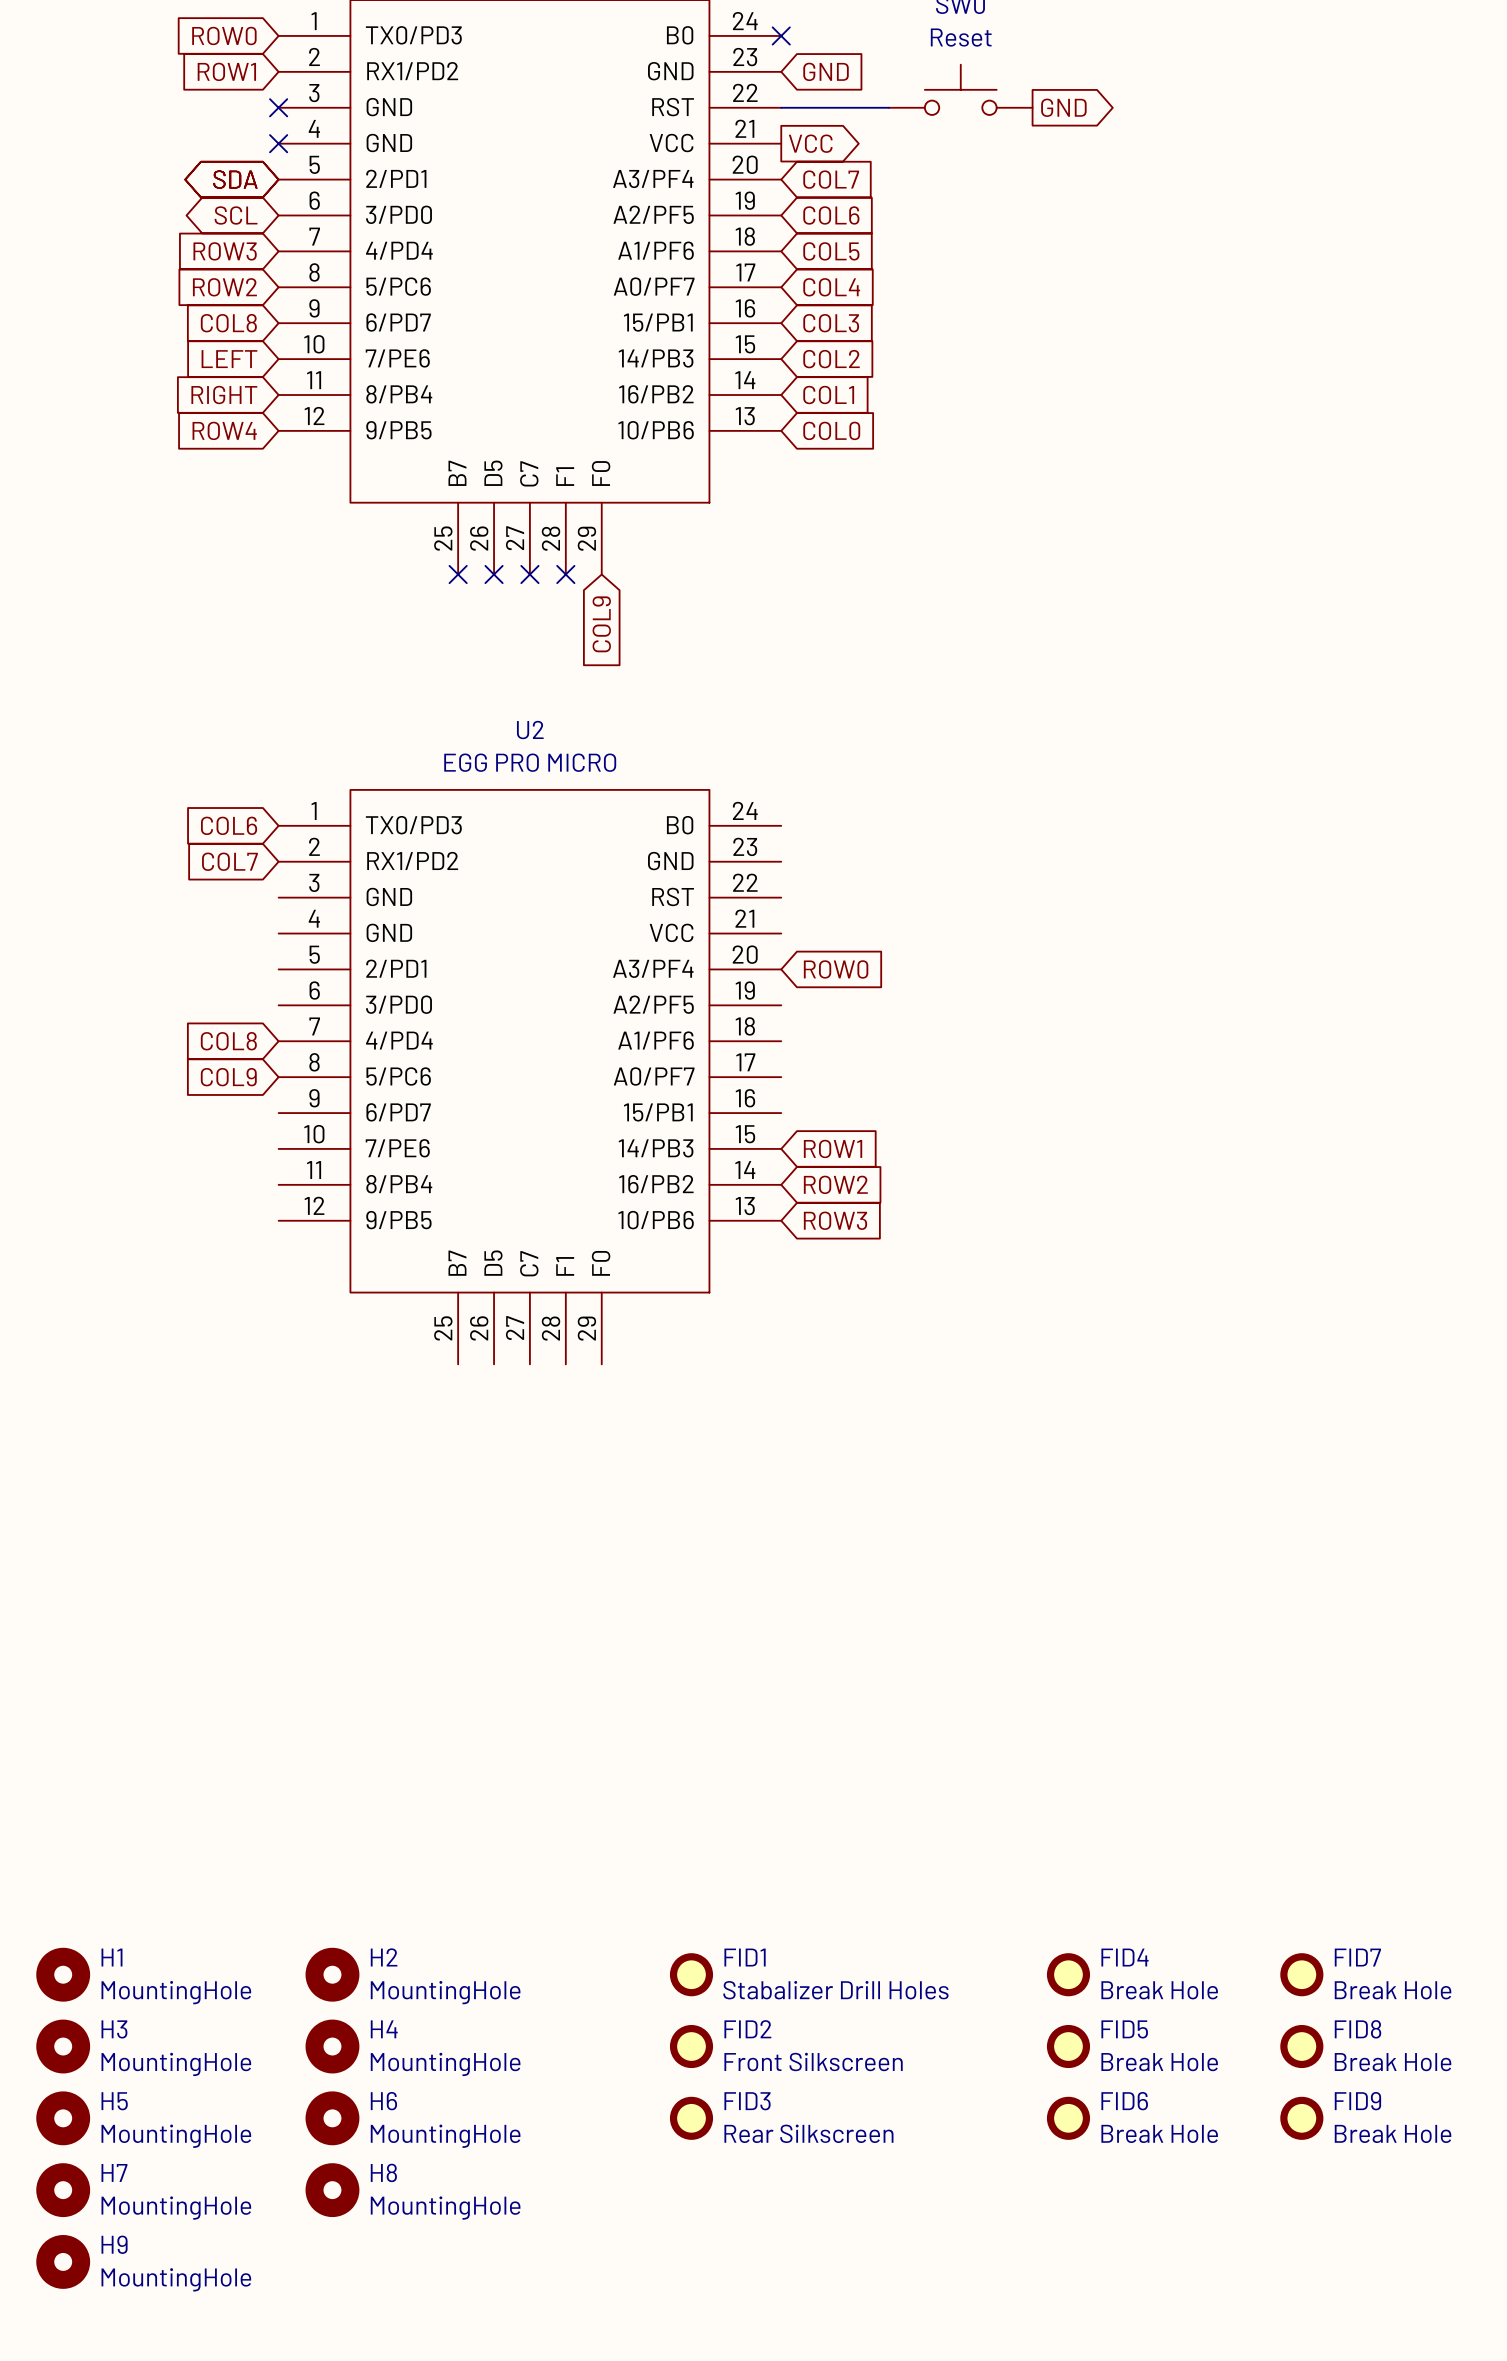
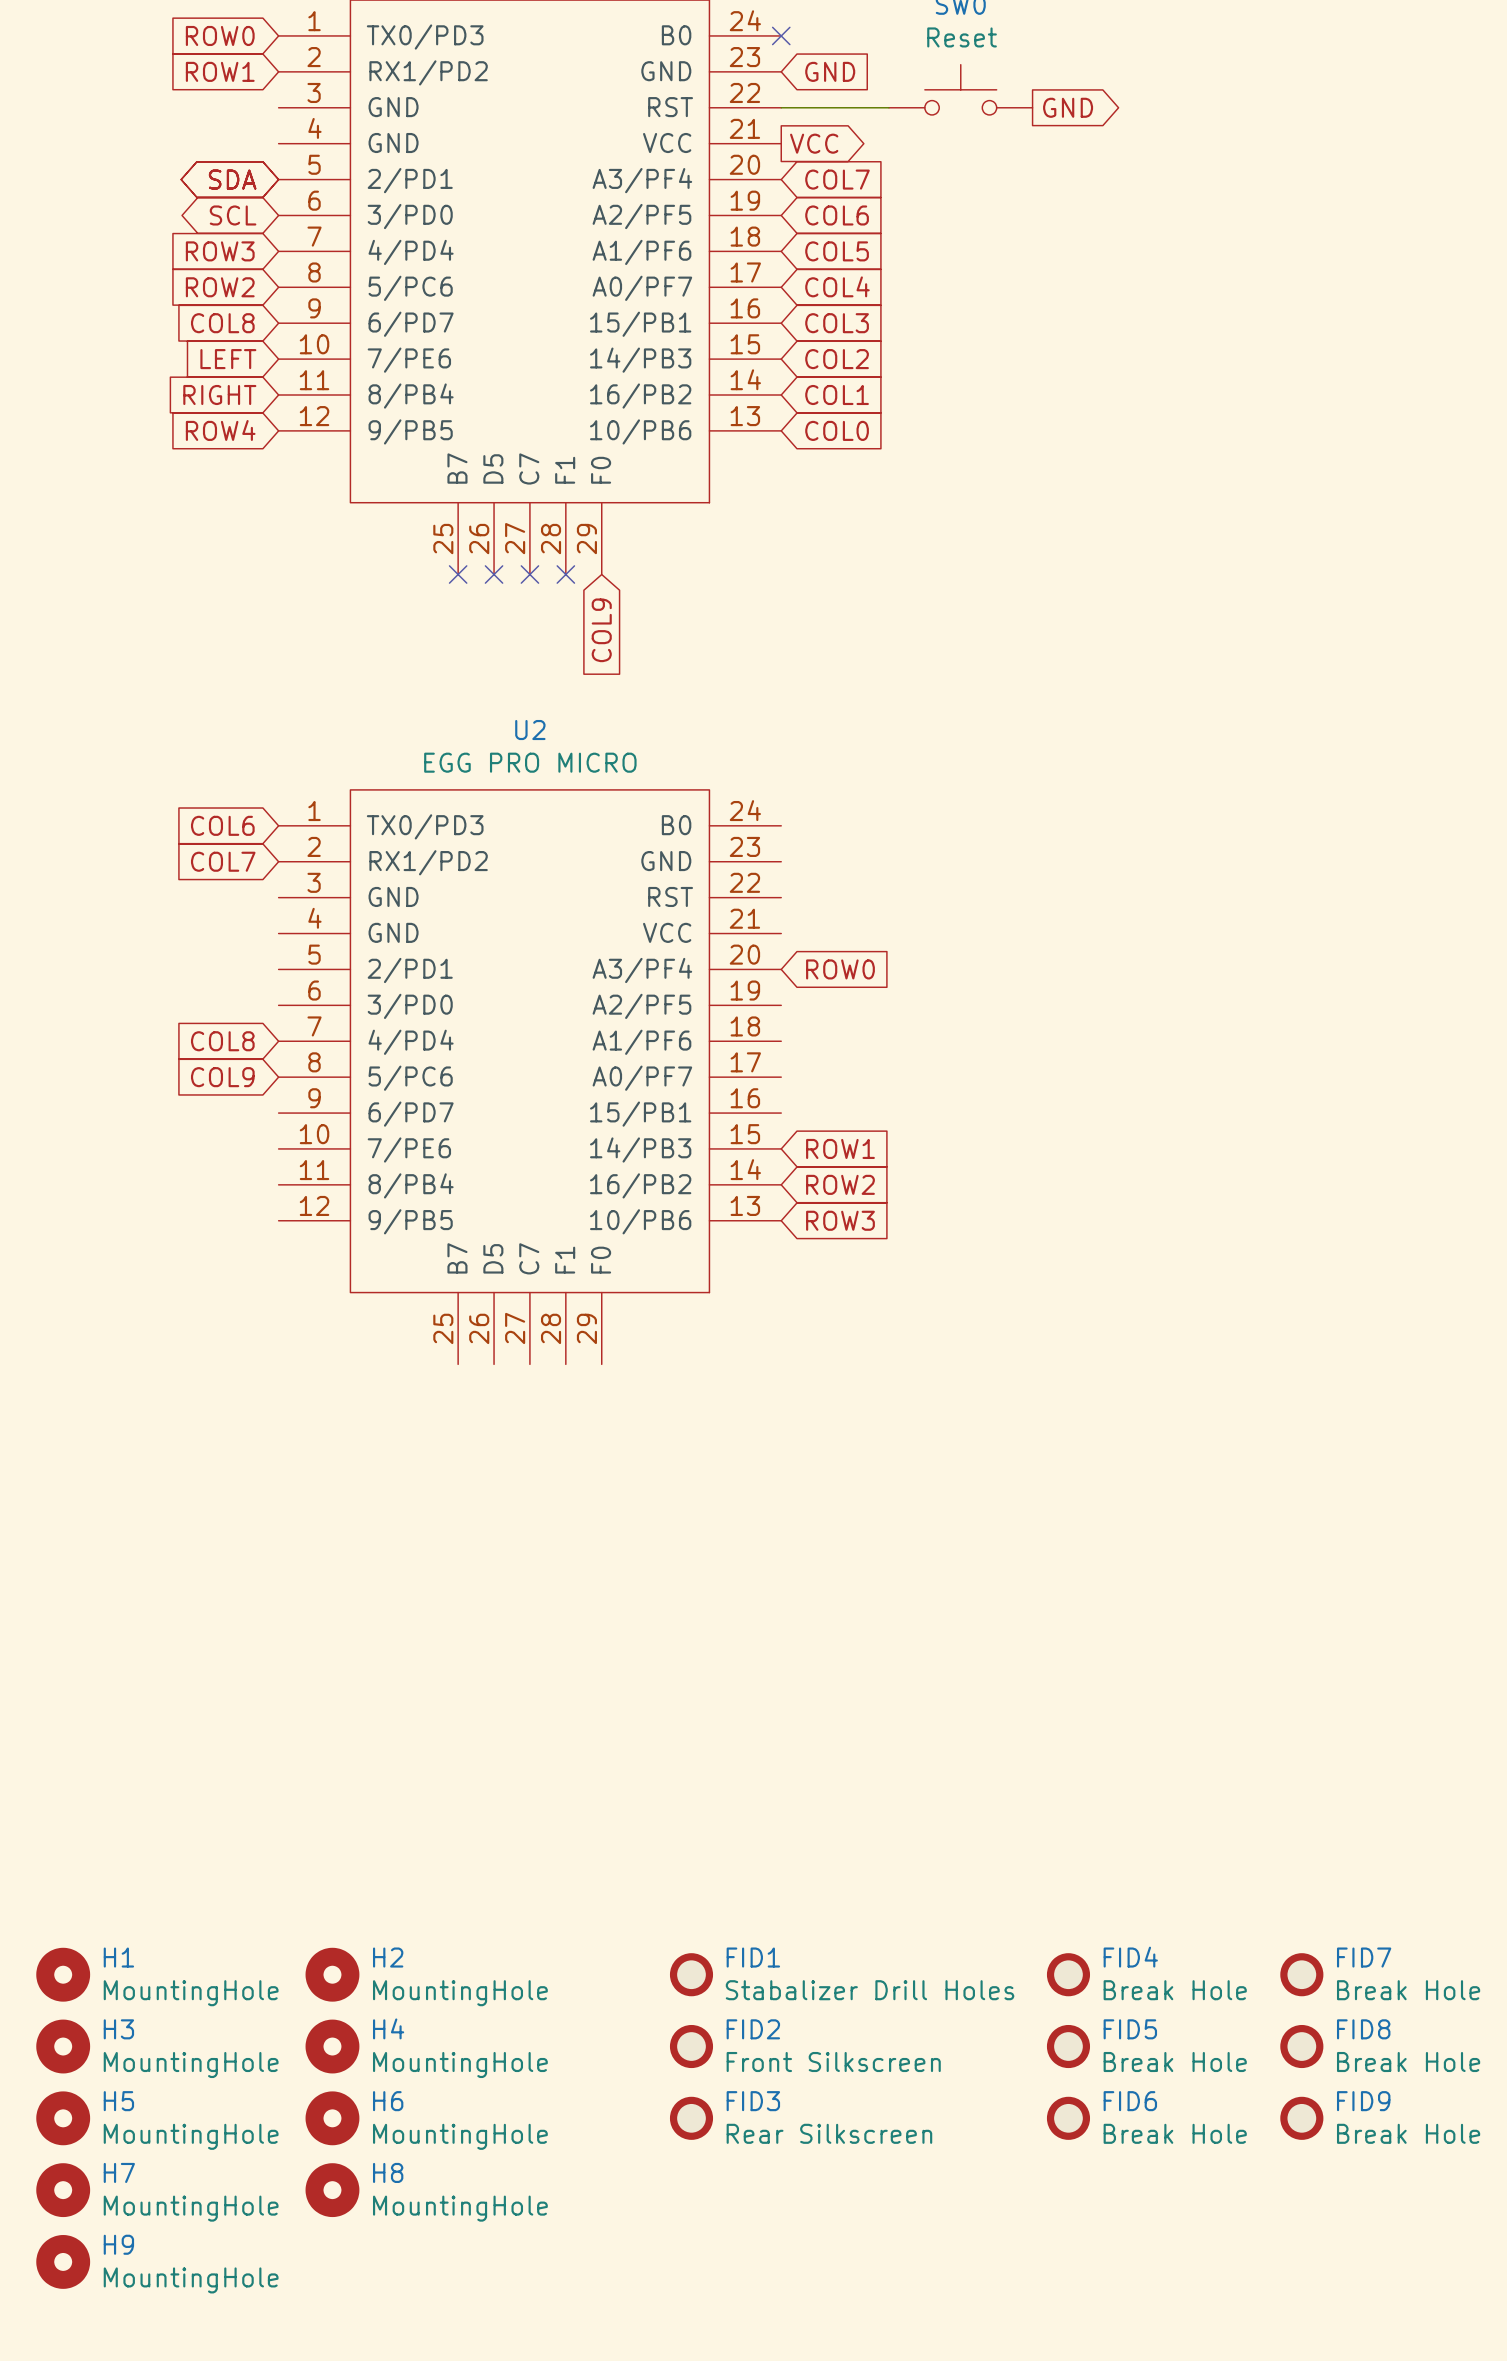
no-connect mark: (278, 107) -> none
no-connect mark: (278, 143) -> none

